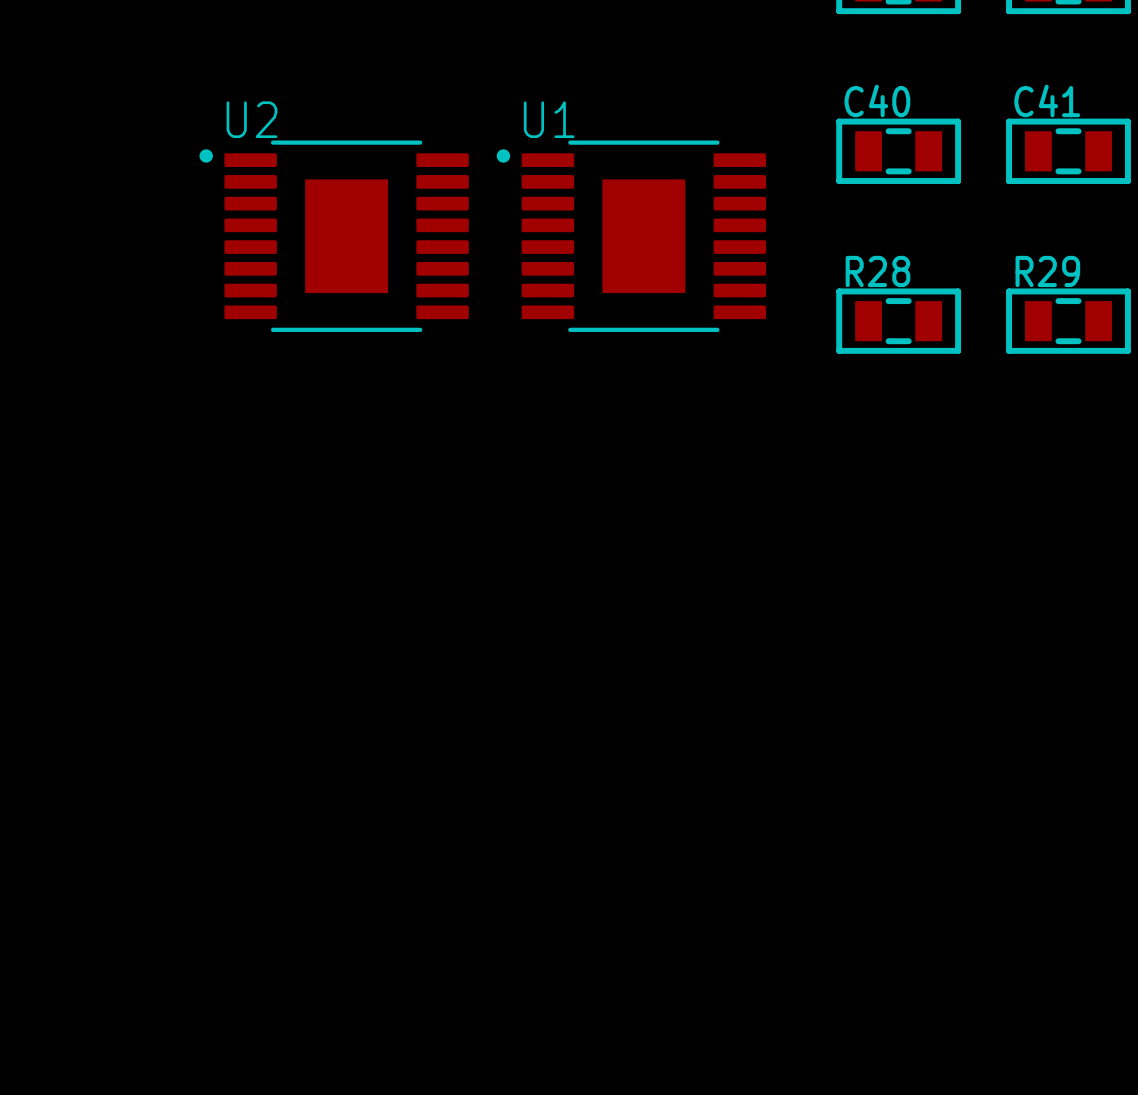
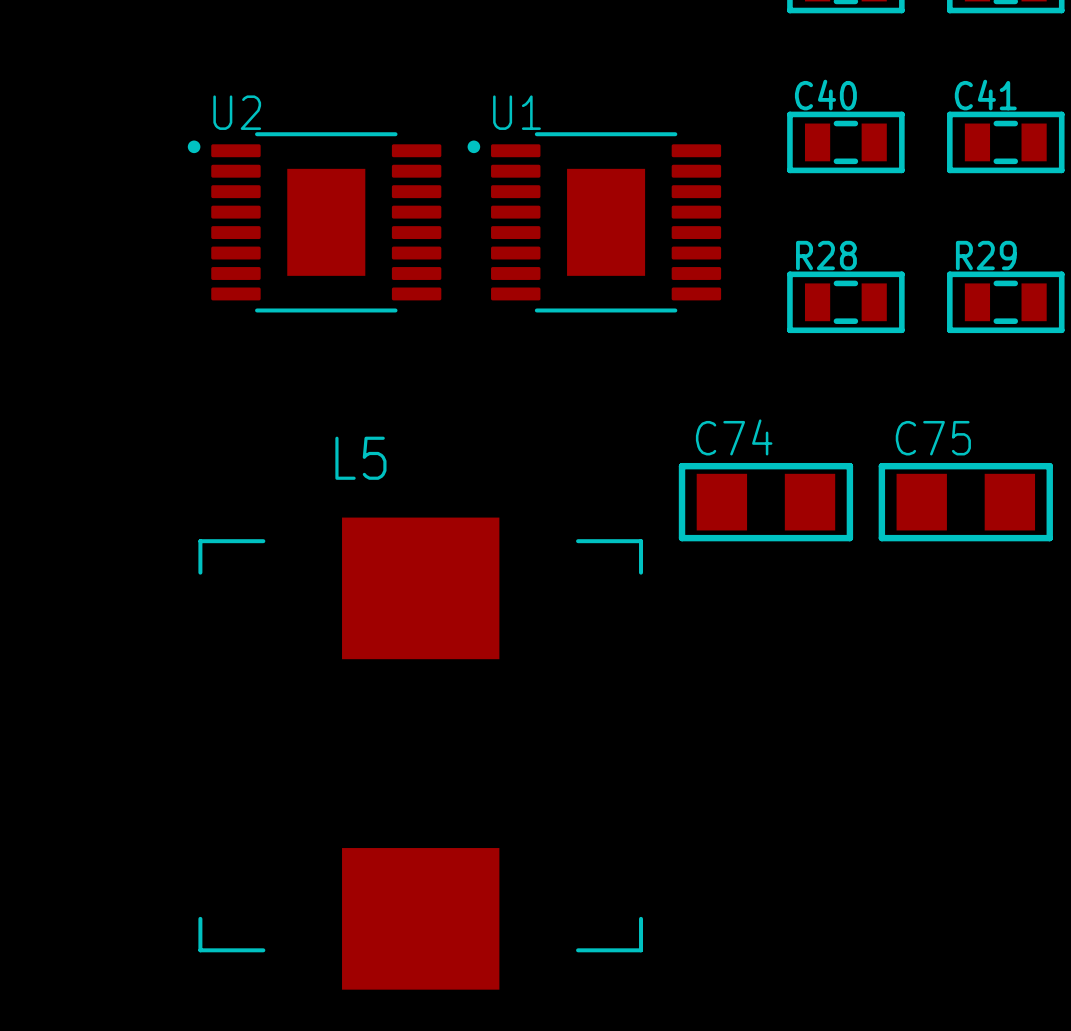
C74: none -> (765, 502)
C75: none -> (965, 502)
L5: none -> (420, 753)

